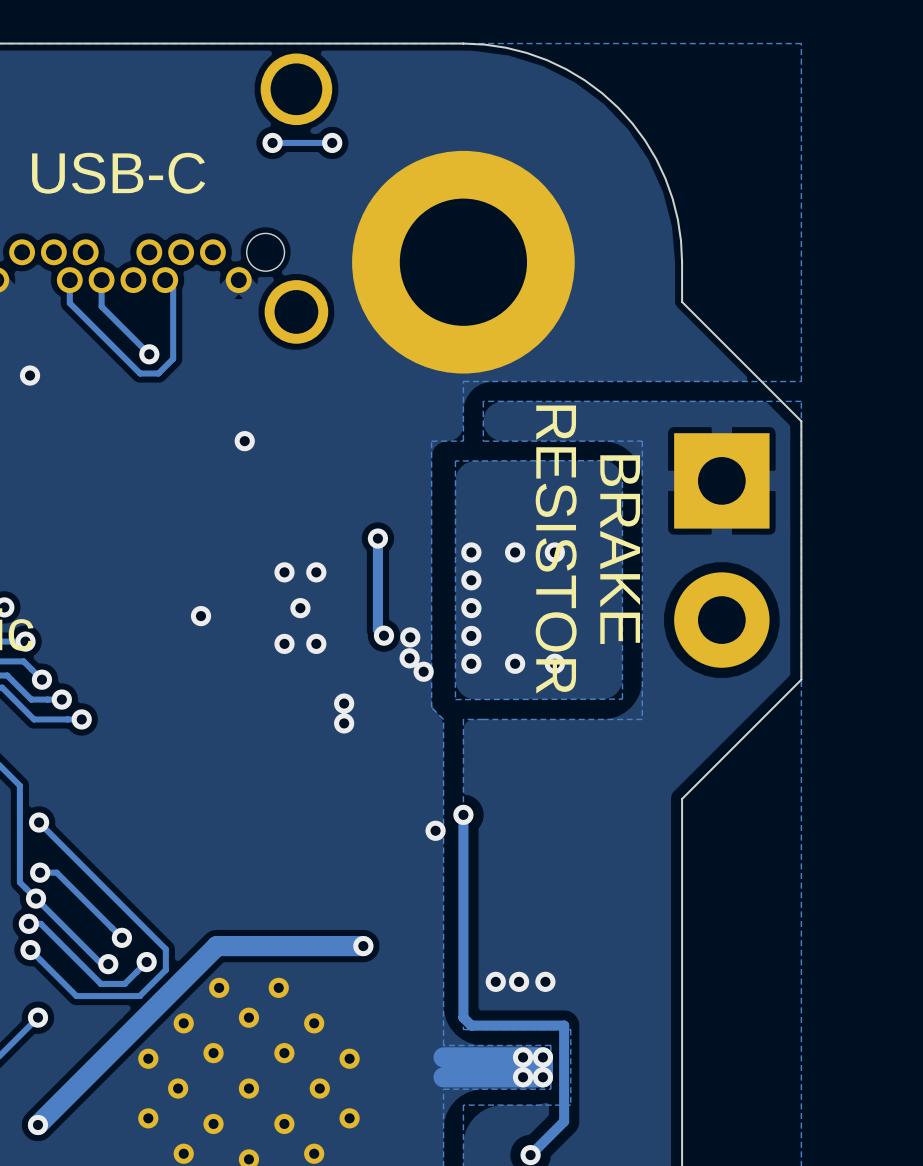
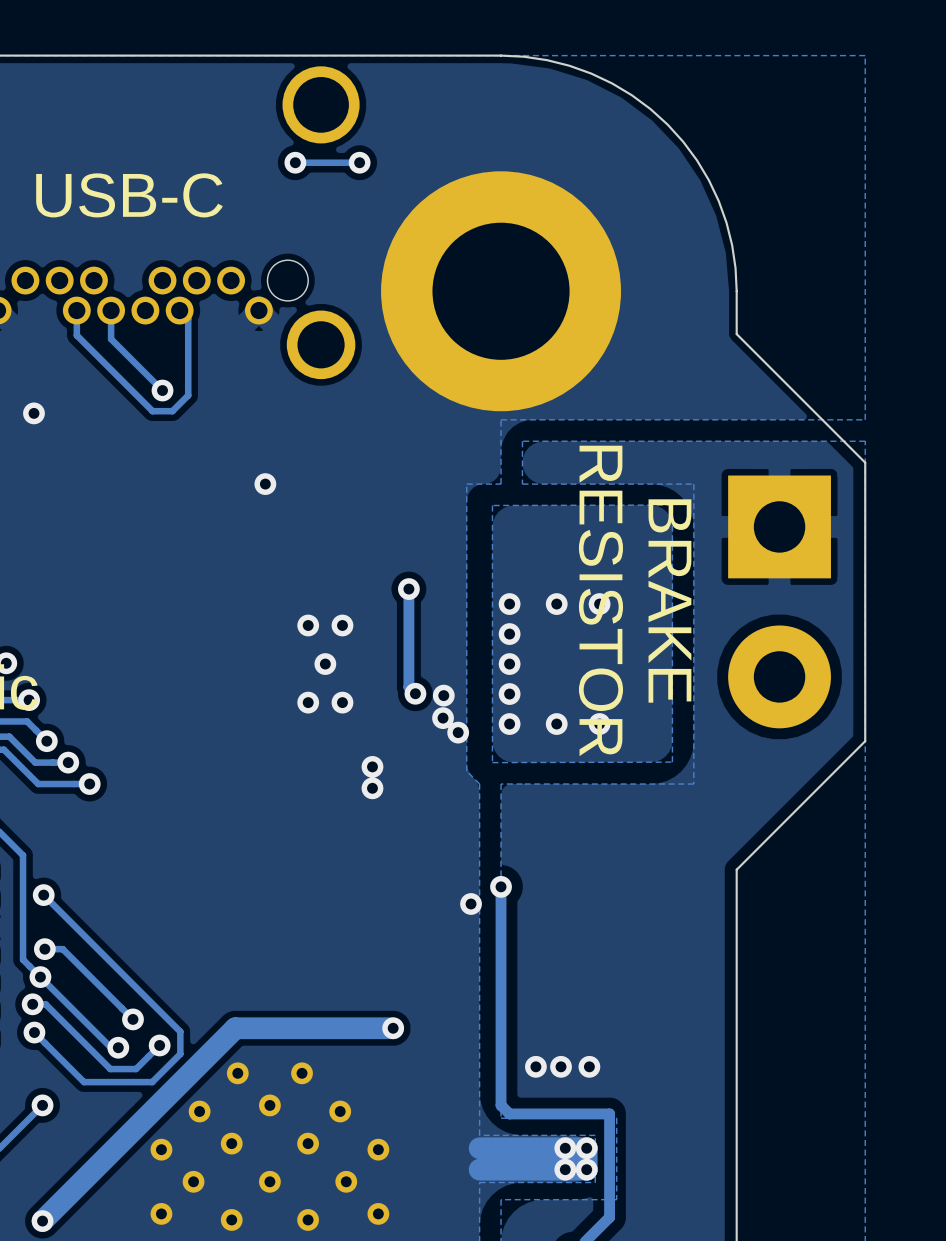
via: (201, 616) -> none

